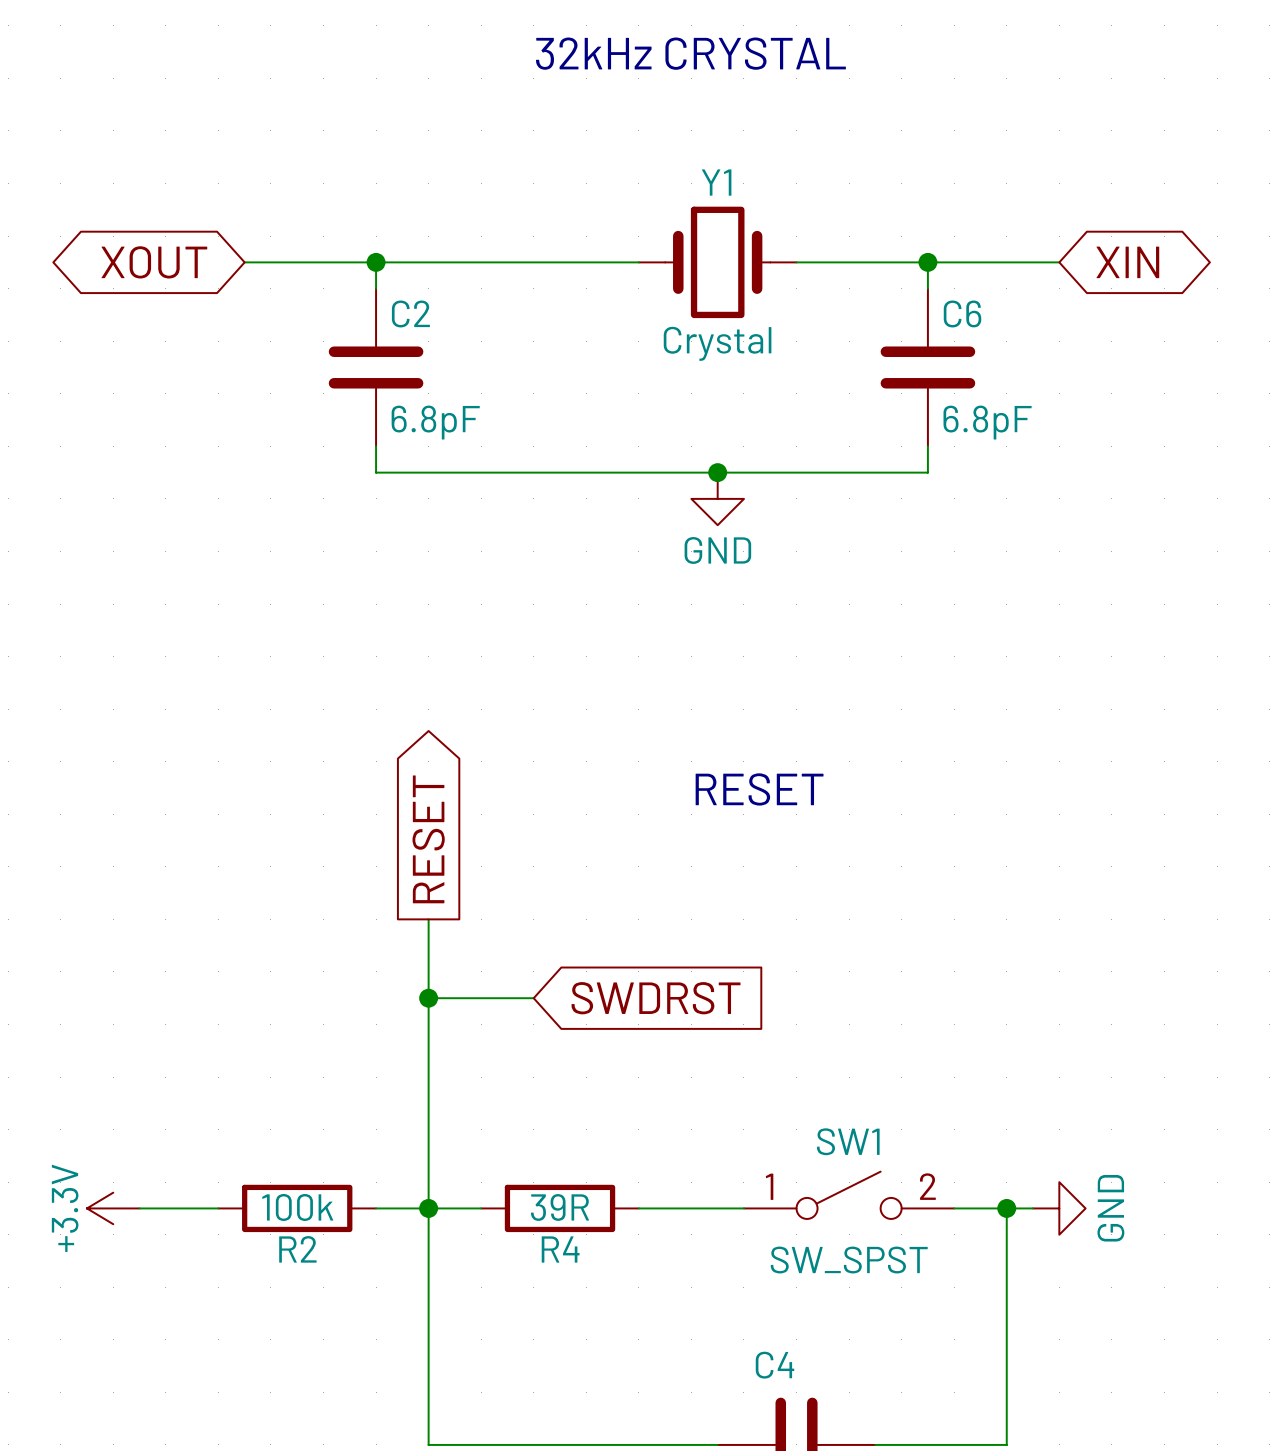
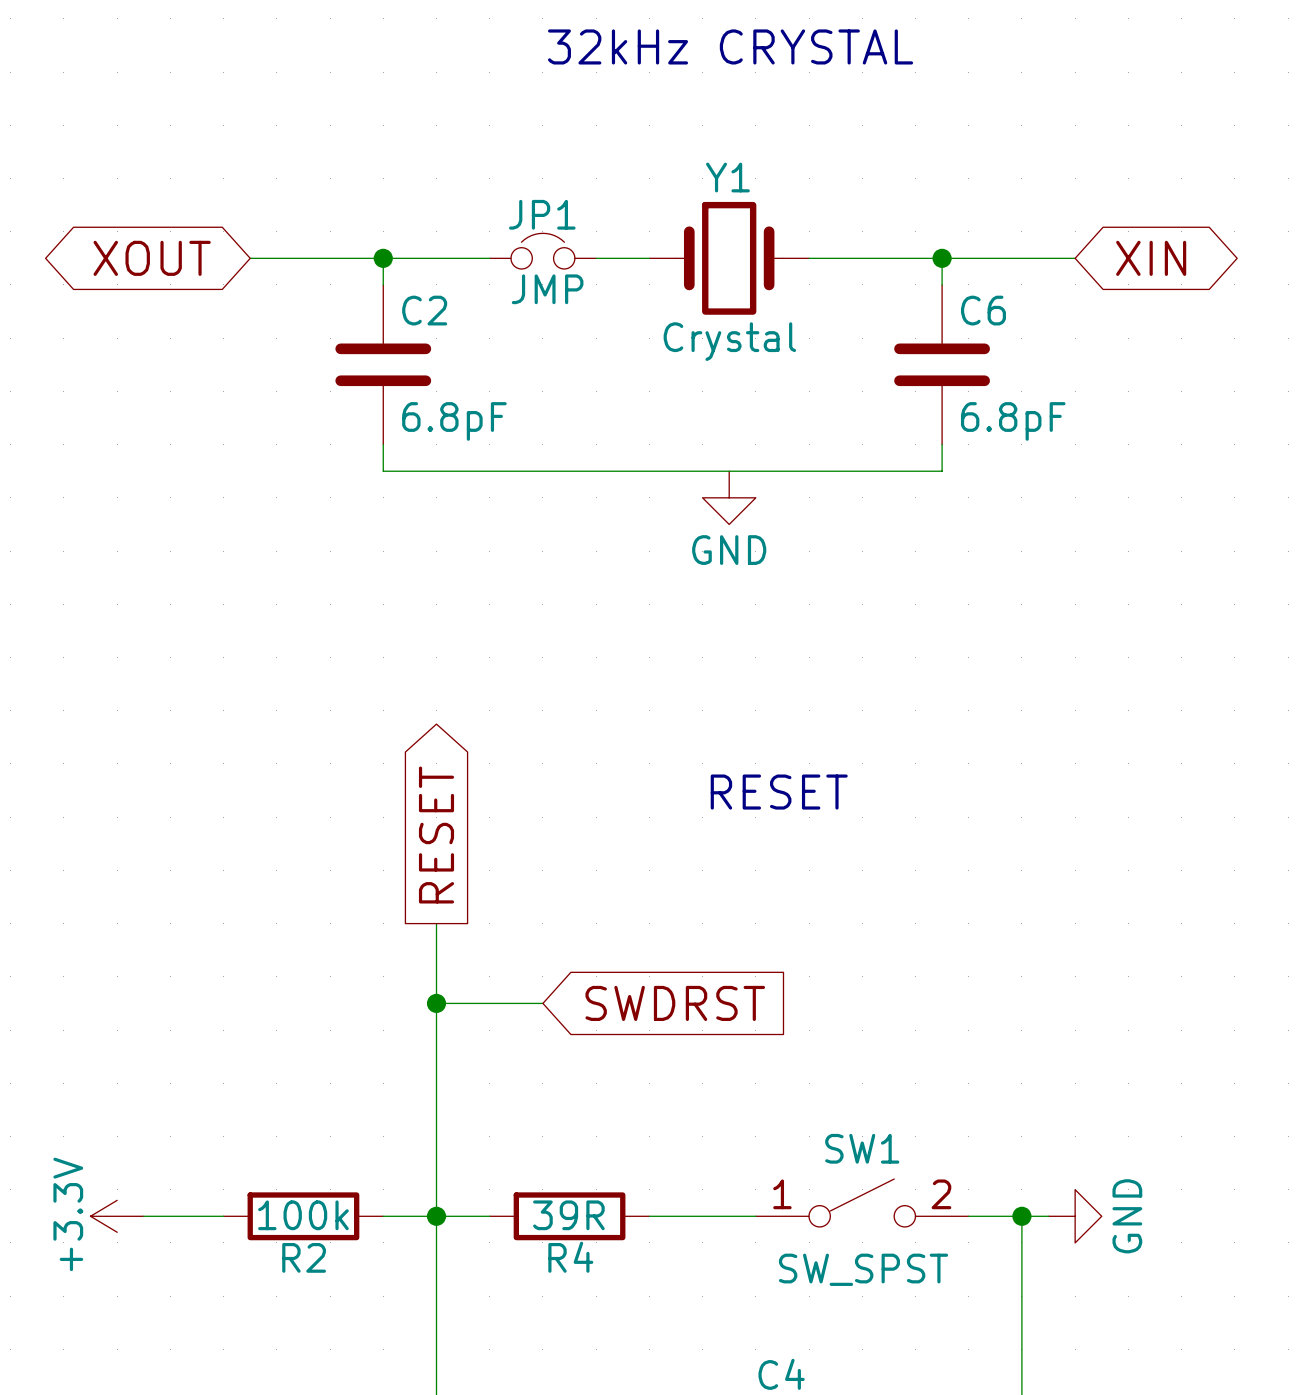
JP1: none -> JMP (542, 251)
wire: (481, 262) (586, 262) -> none
junction: (717, 472) -> none

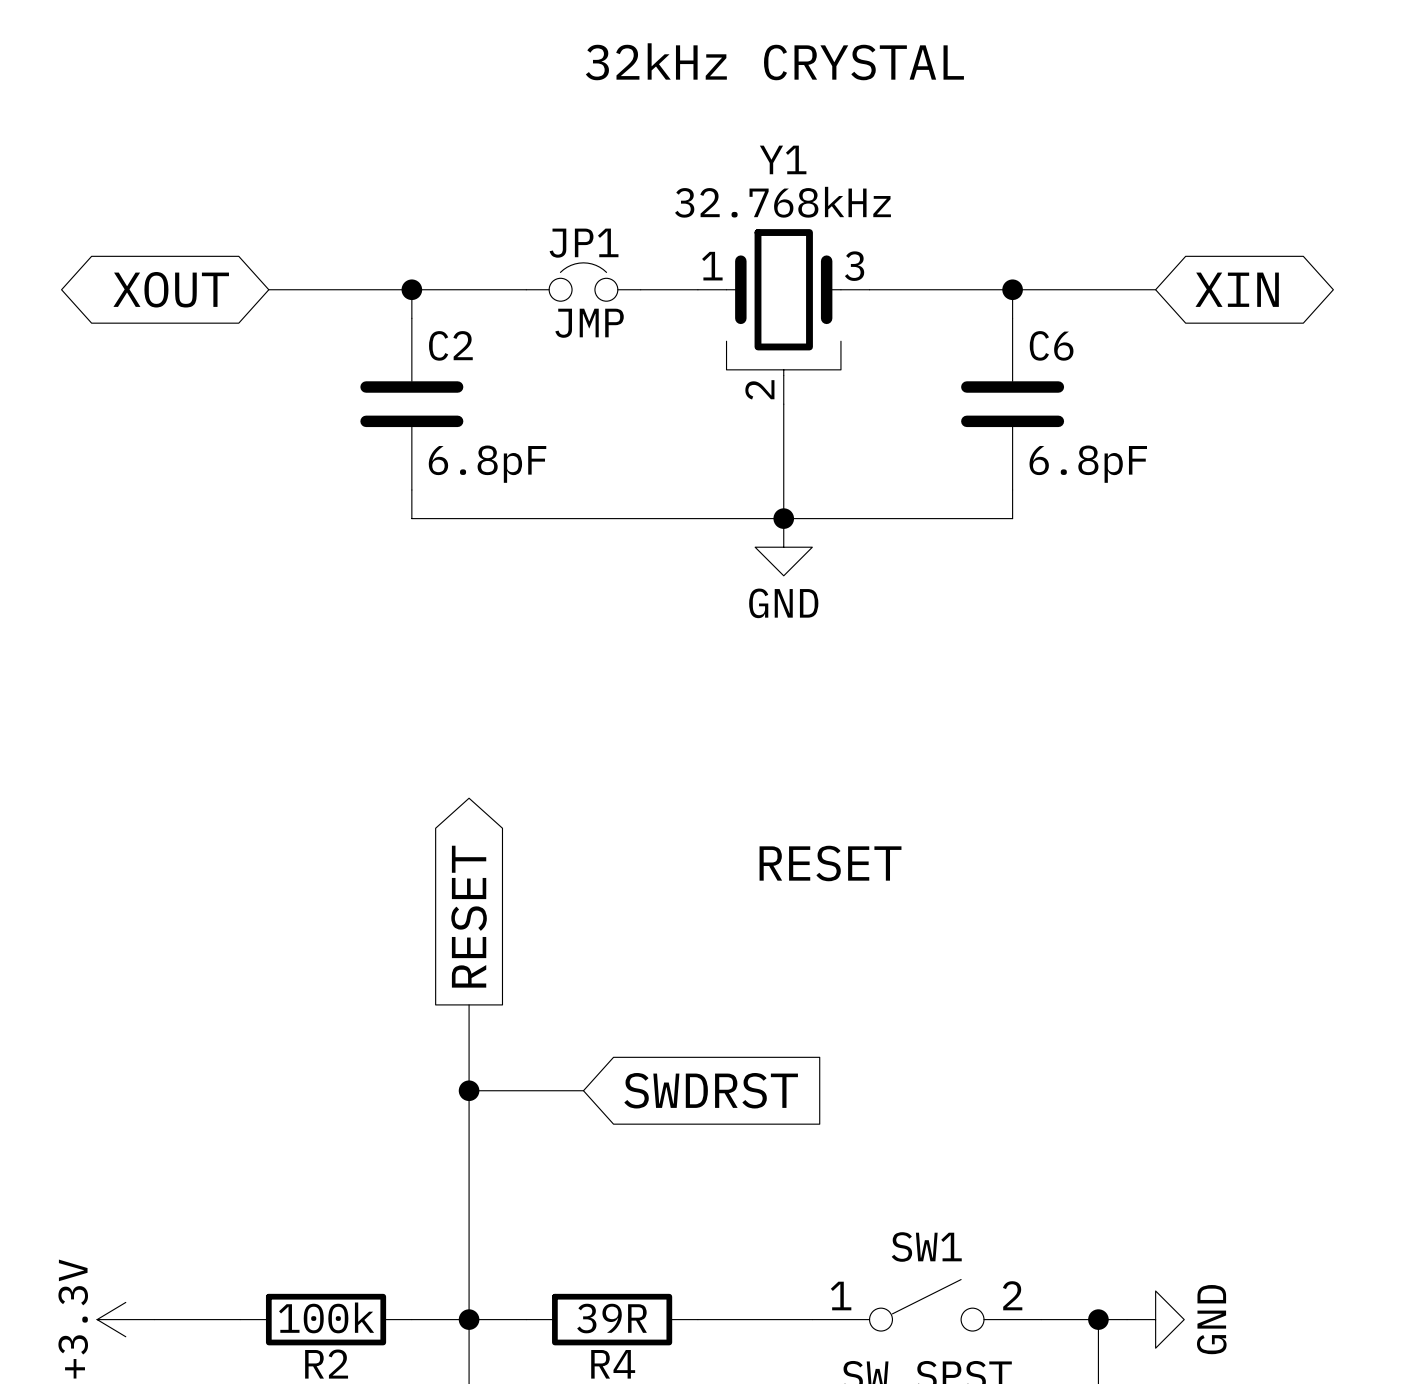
Y1 name position: Y1 (727, 177) -> Y1 (783, 159)
Y1 symbol: [649, 201, 810, 315] -> [697, 229, 870, 405]
Y1 value: Crystal (729, 341) -> 32.768kHz (782, 202)
wire: none -> (783, 404) (783, 518)
junction: none -> (783, 518)

